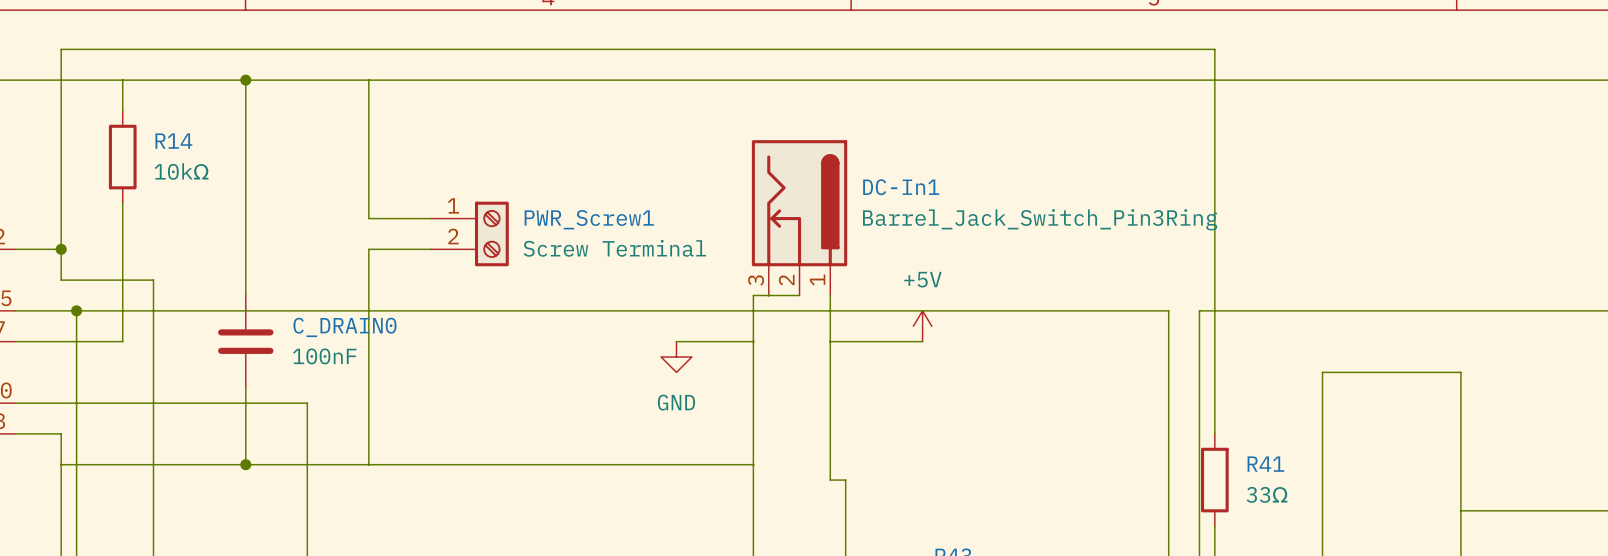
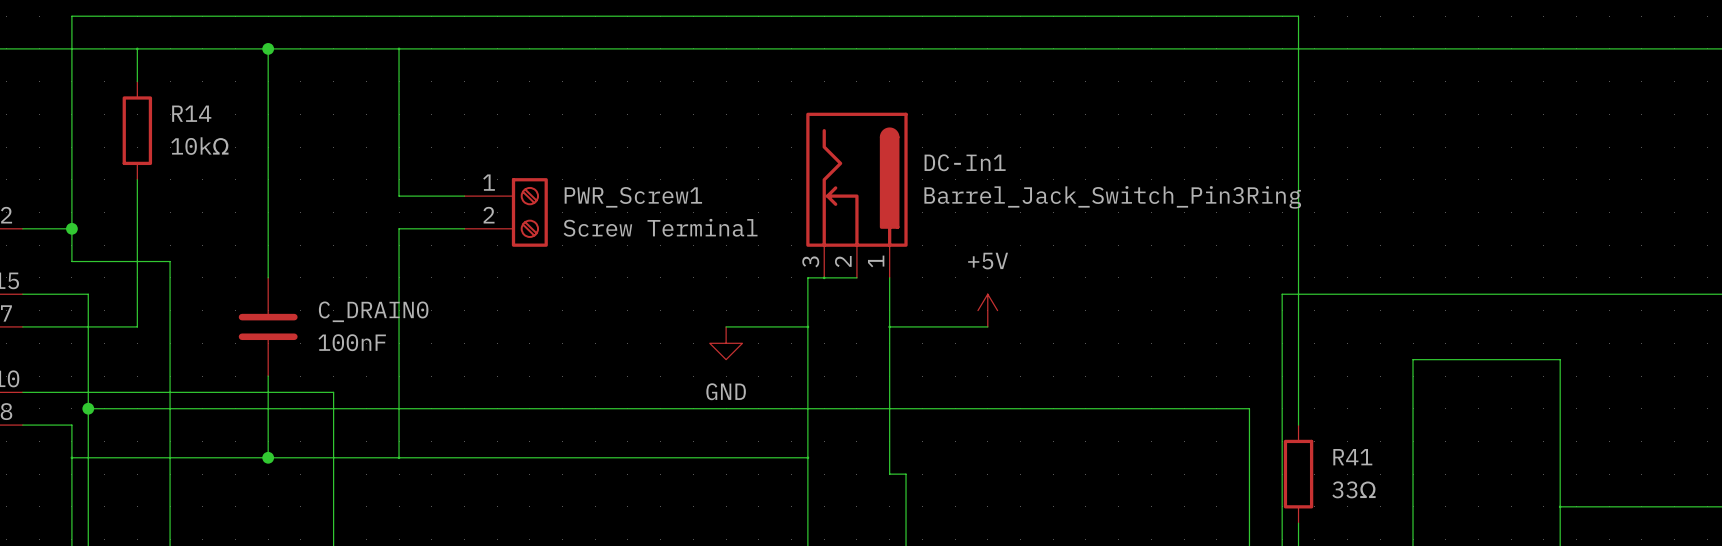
wire: (76, 310) (1168, 310) (1168, 418) -> (88, 408) (1249, 408)
junction: (76, 310) -> none
junction: none -> (88, 408)

